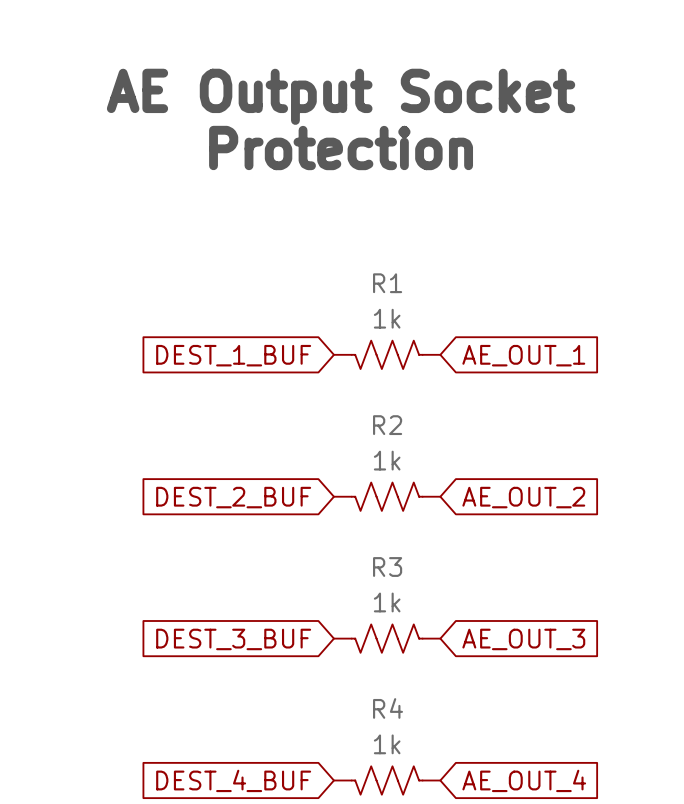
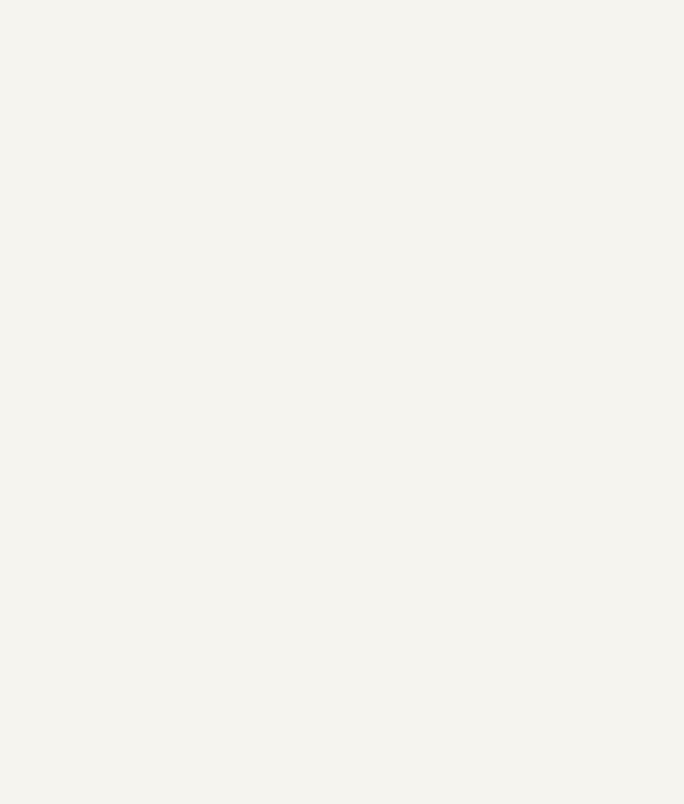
text: AE Output Socket (341, 96) -> none
text: Protection (341, 148) -> none
R1: 1k (387, 354) -> none
global label: DEST_1_BUF (233, 355) -> none
global label: AE_OUT_1 (523, 355) -> none
R2: 1k (387, 496) -> none
global label: DEST_2_BUF (233, 497) -> none
global label: AE_OUT_2 (523, 497) -> none
R3: 1k (387, 638) -> none
global label: DEST_3_BUF (233, 639) -> none
global label: AE_OUT_3 (523, 639) -> none
global label: DEST_4_BUF (233, 780) -> none
R4: 1k (387, 780) -> none
global label: AE_OUT_4 (524, 780) -> none

